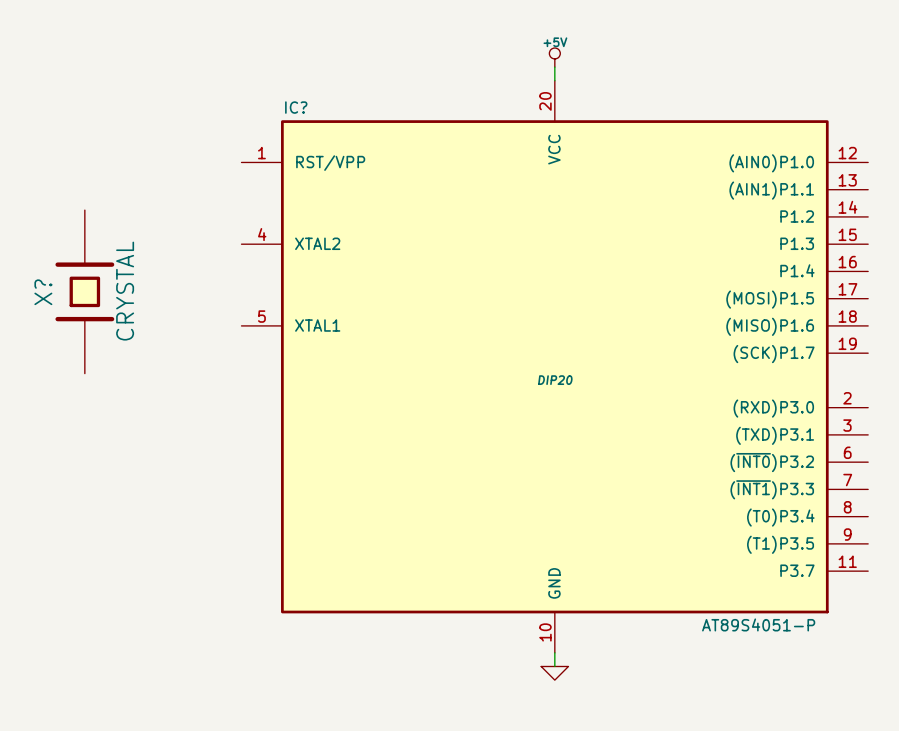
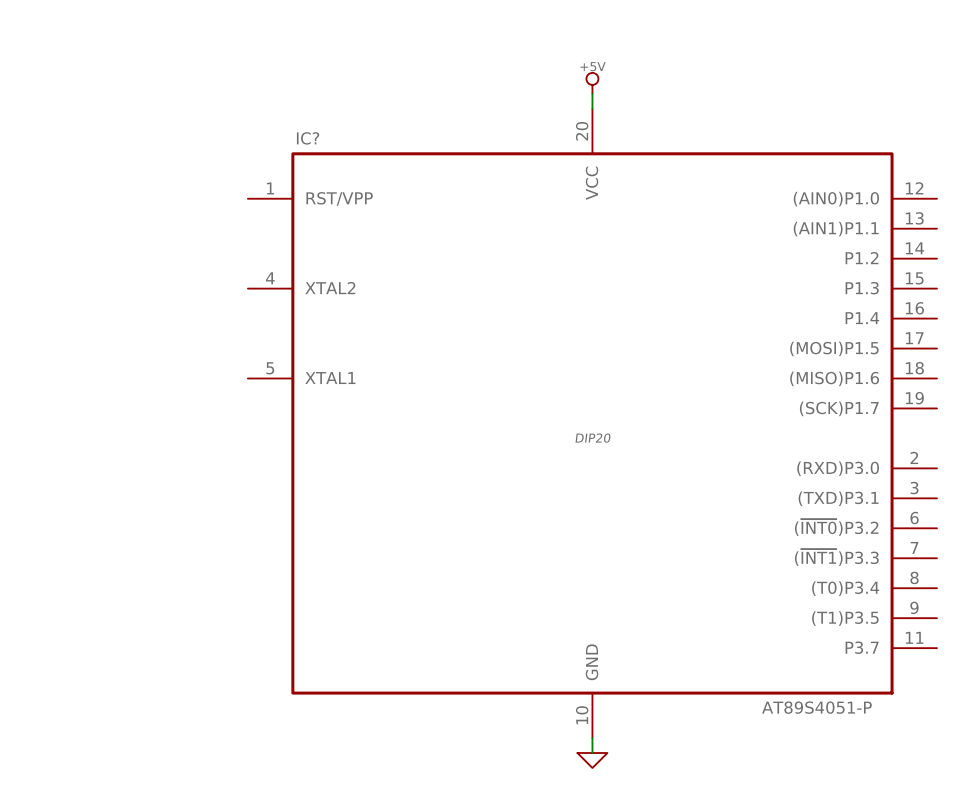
X?: CRYSTAL (84, 291) -> none

